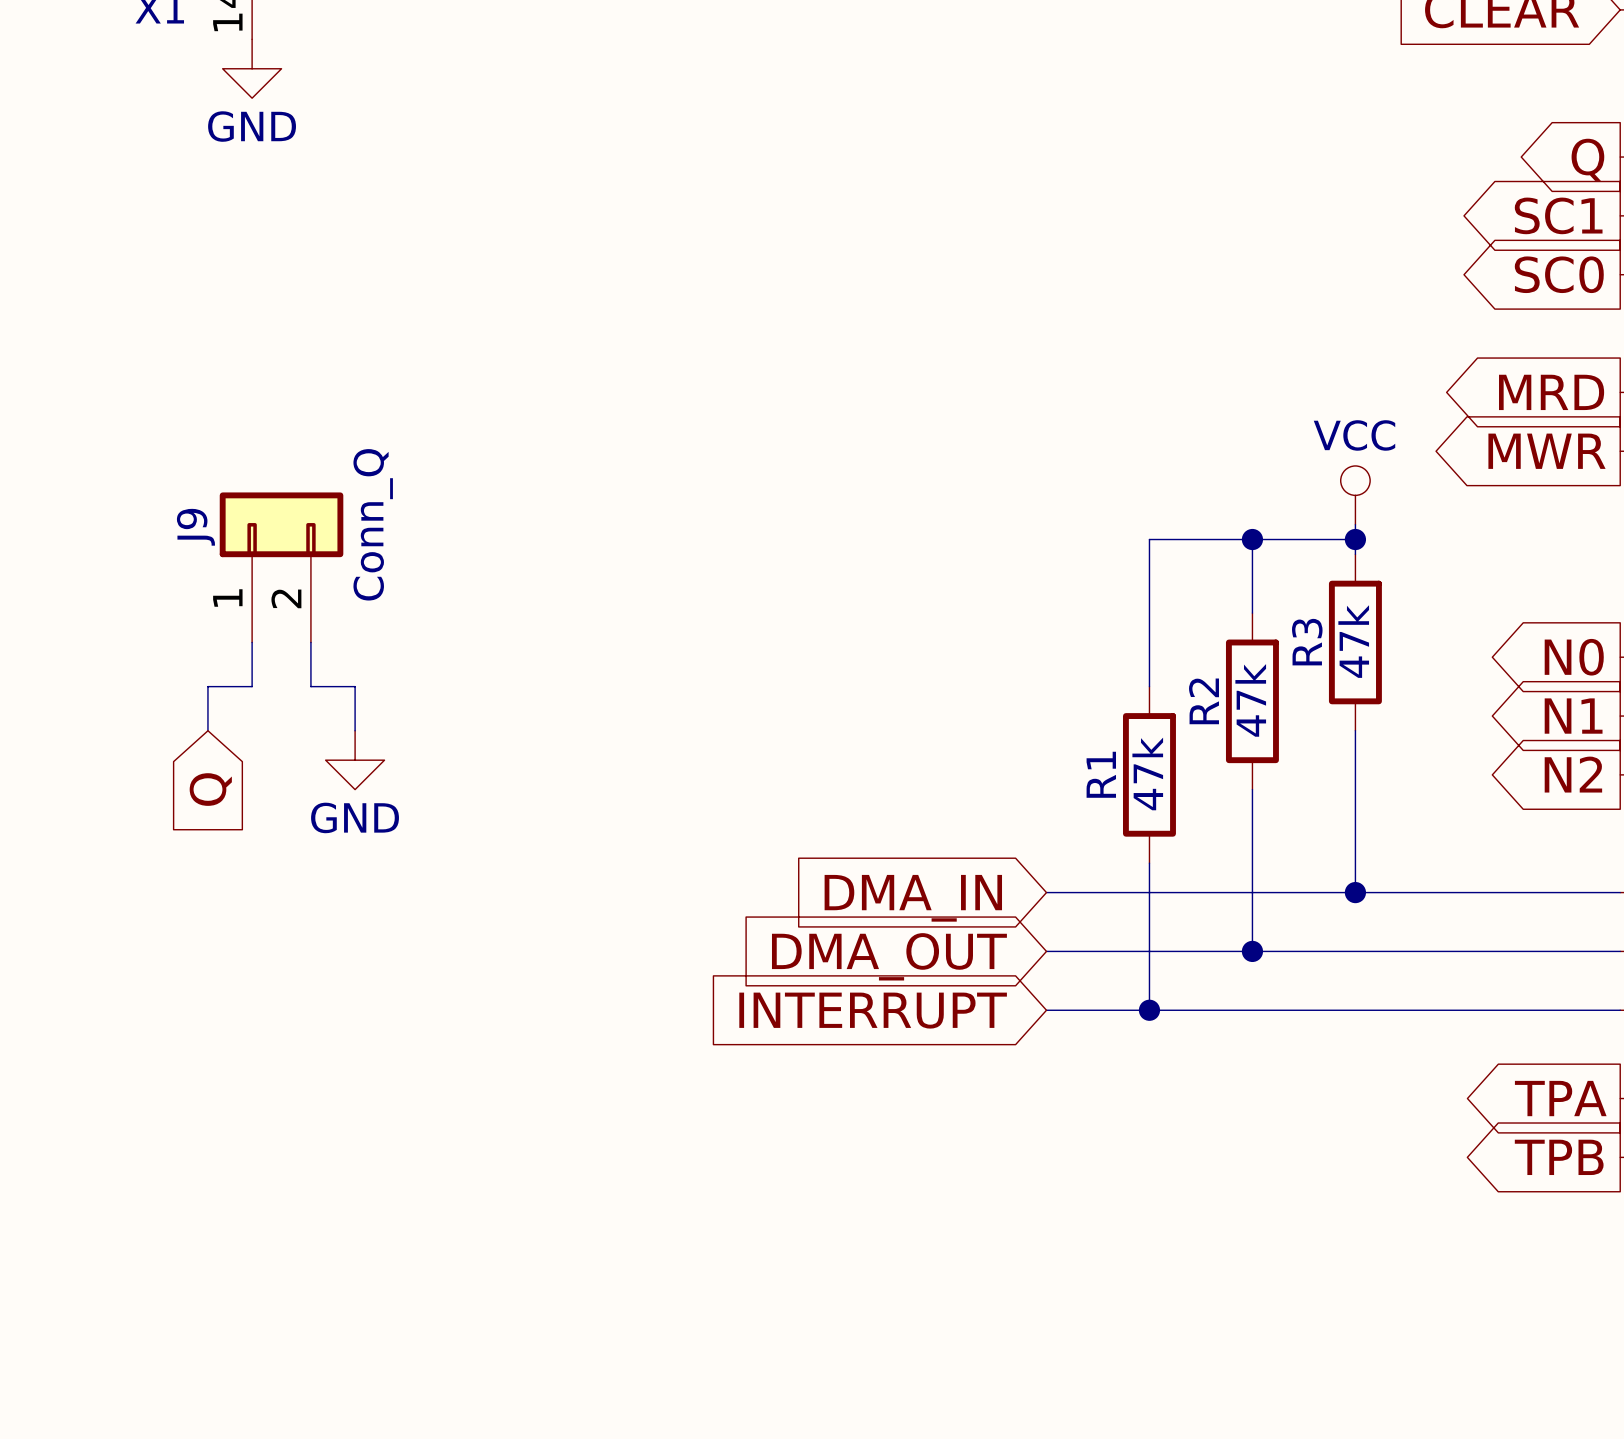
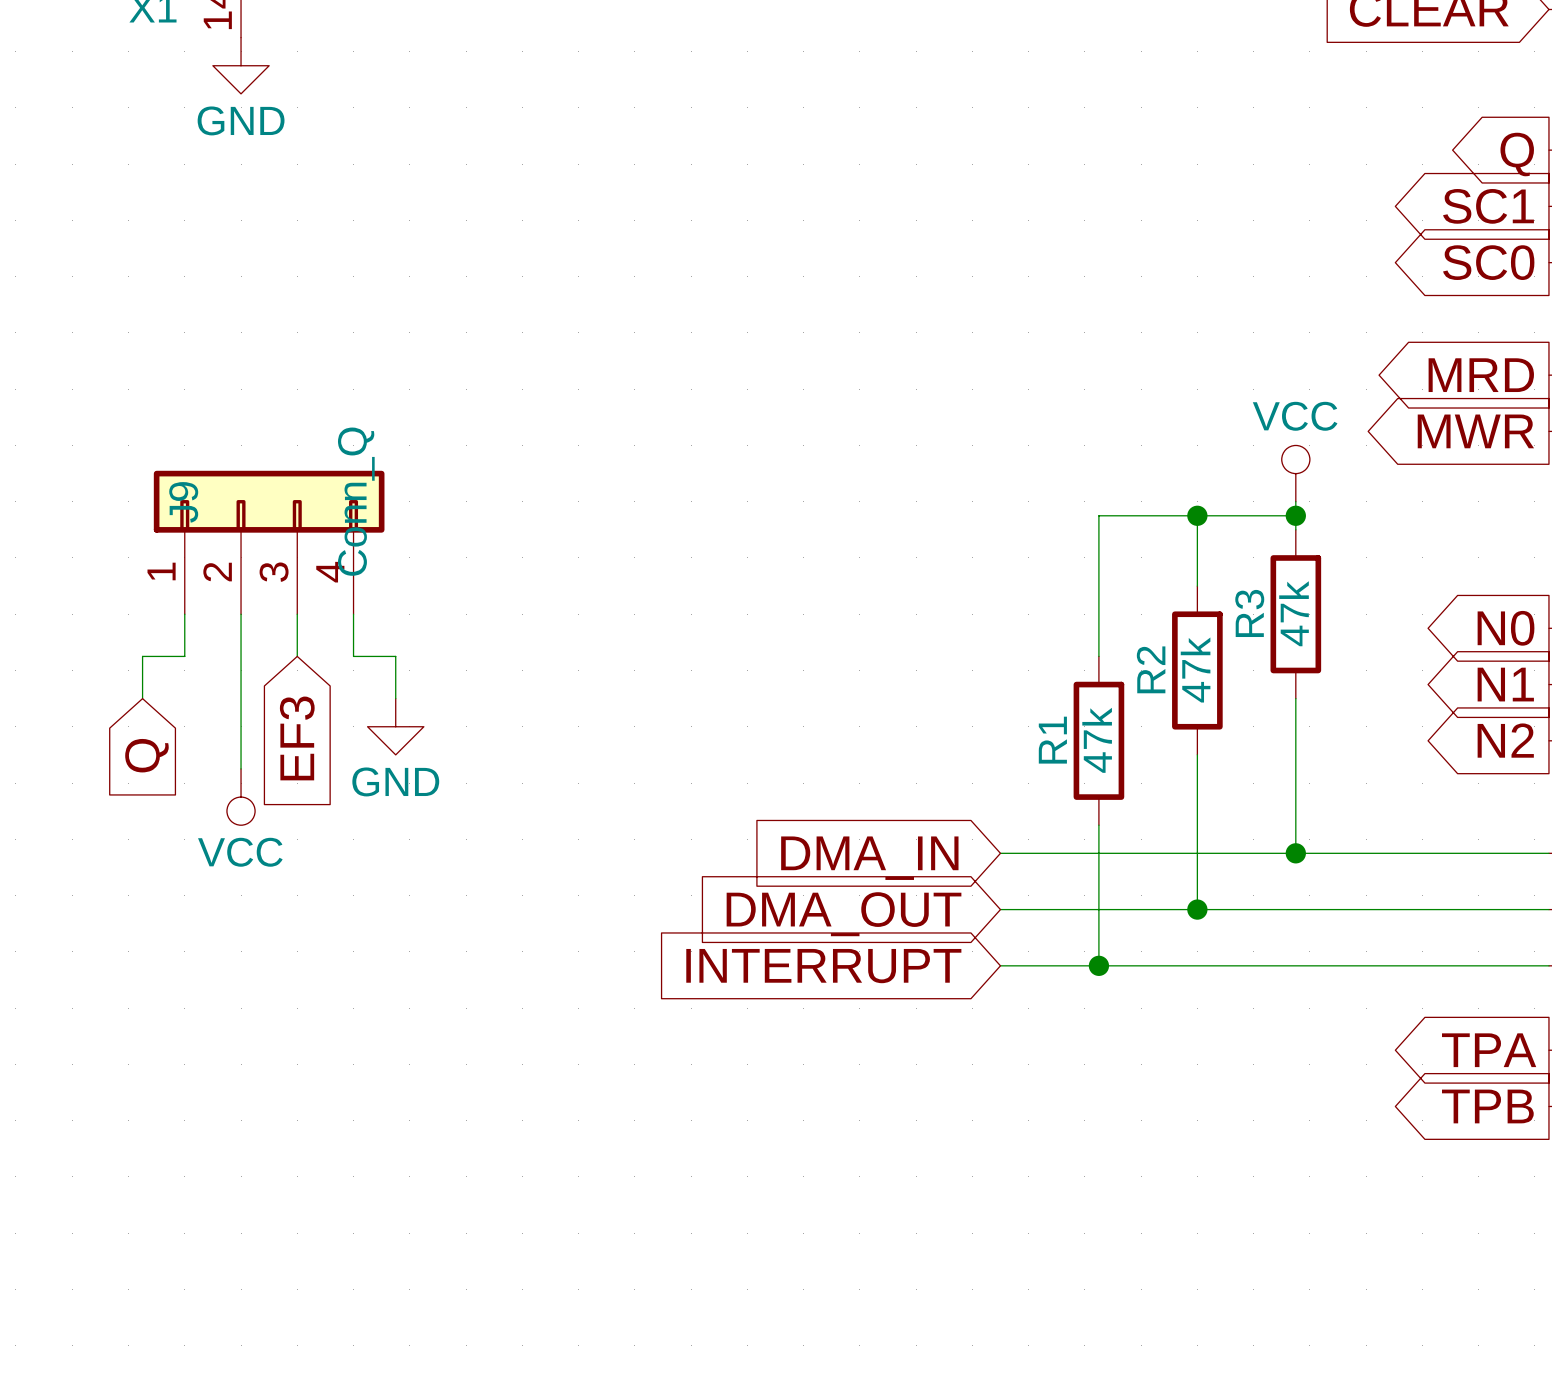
J9 symbol: [219, 492, 344, 643] -> [153, 470, 385, 615]
wire: none -> (184, 614) (184, 656) (142, 656) (142, 698)
wire: none -> (353, 614) (353, 656) (395, 656) (395, 698)
wire: (252, 686) (207, 686) (207, 730) -> (241, 656) (241, 768)
wire: (310, 686) (355, 686) (355, 730) -> none
power symbol position: GND (355, 760) -> GND (395, 726)
global label: none -> EF3 (297, 738)
global label position: Q (210, 789) -> Q (146, 755)
power symbol: none -> VCC (241, 797)

